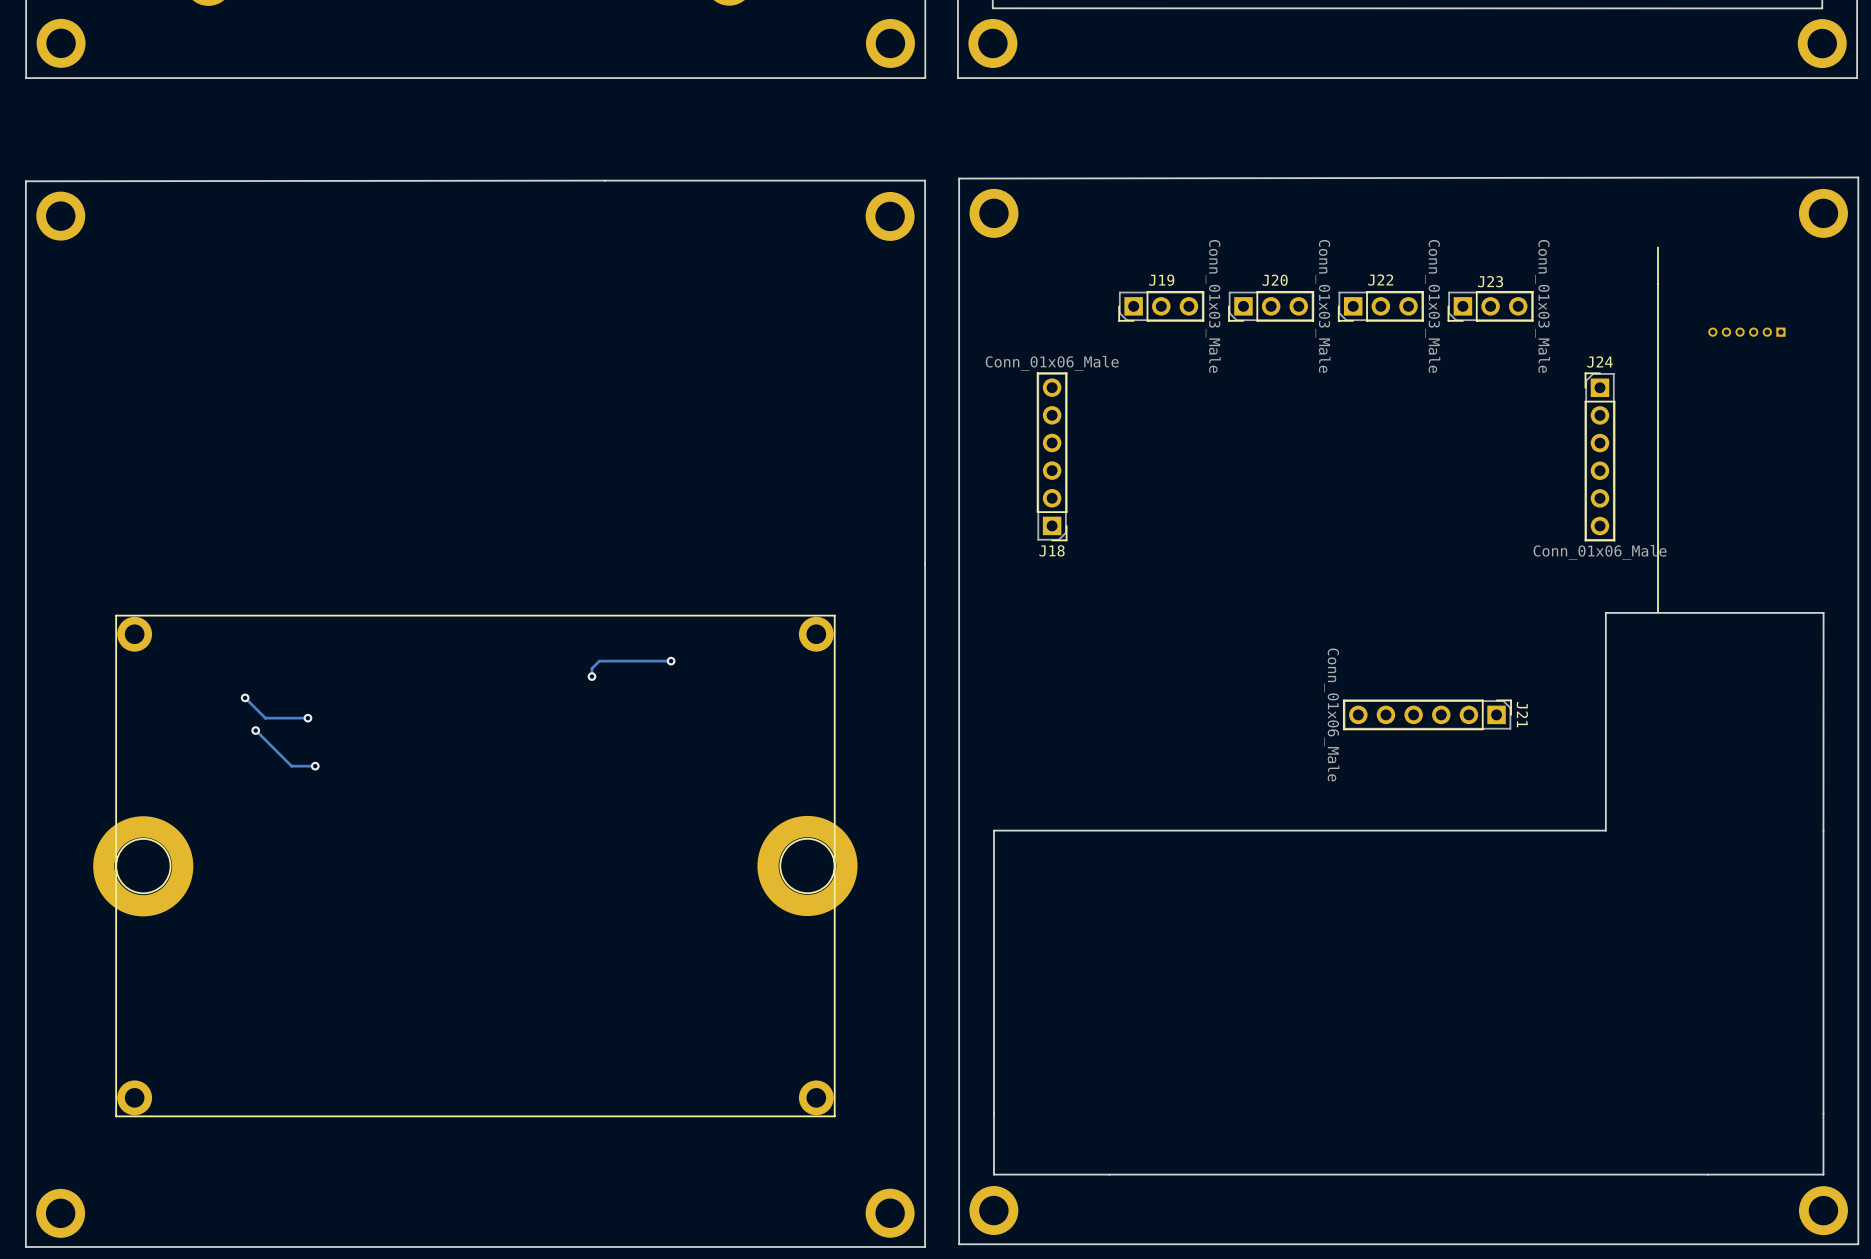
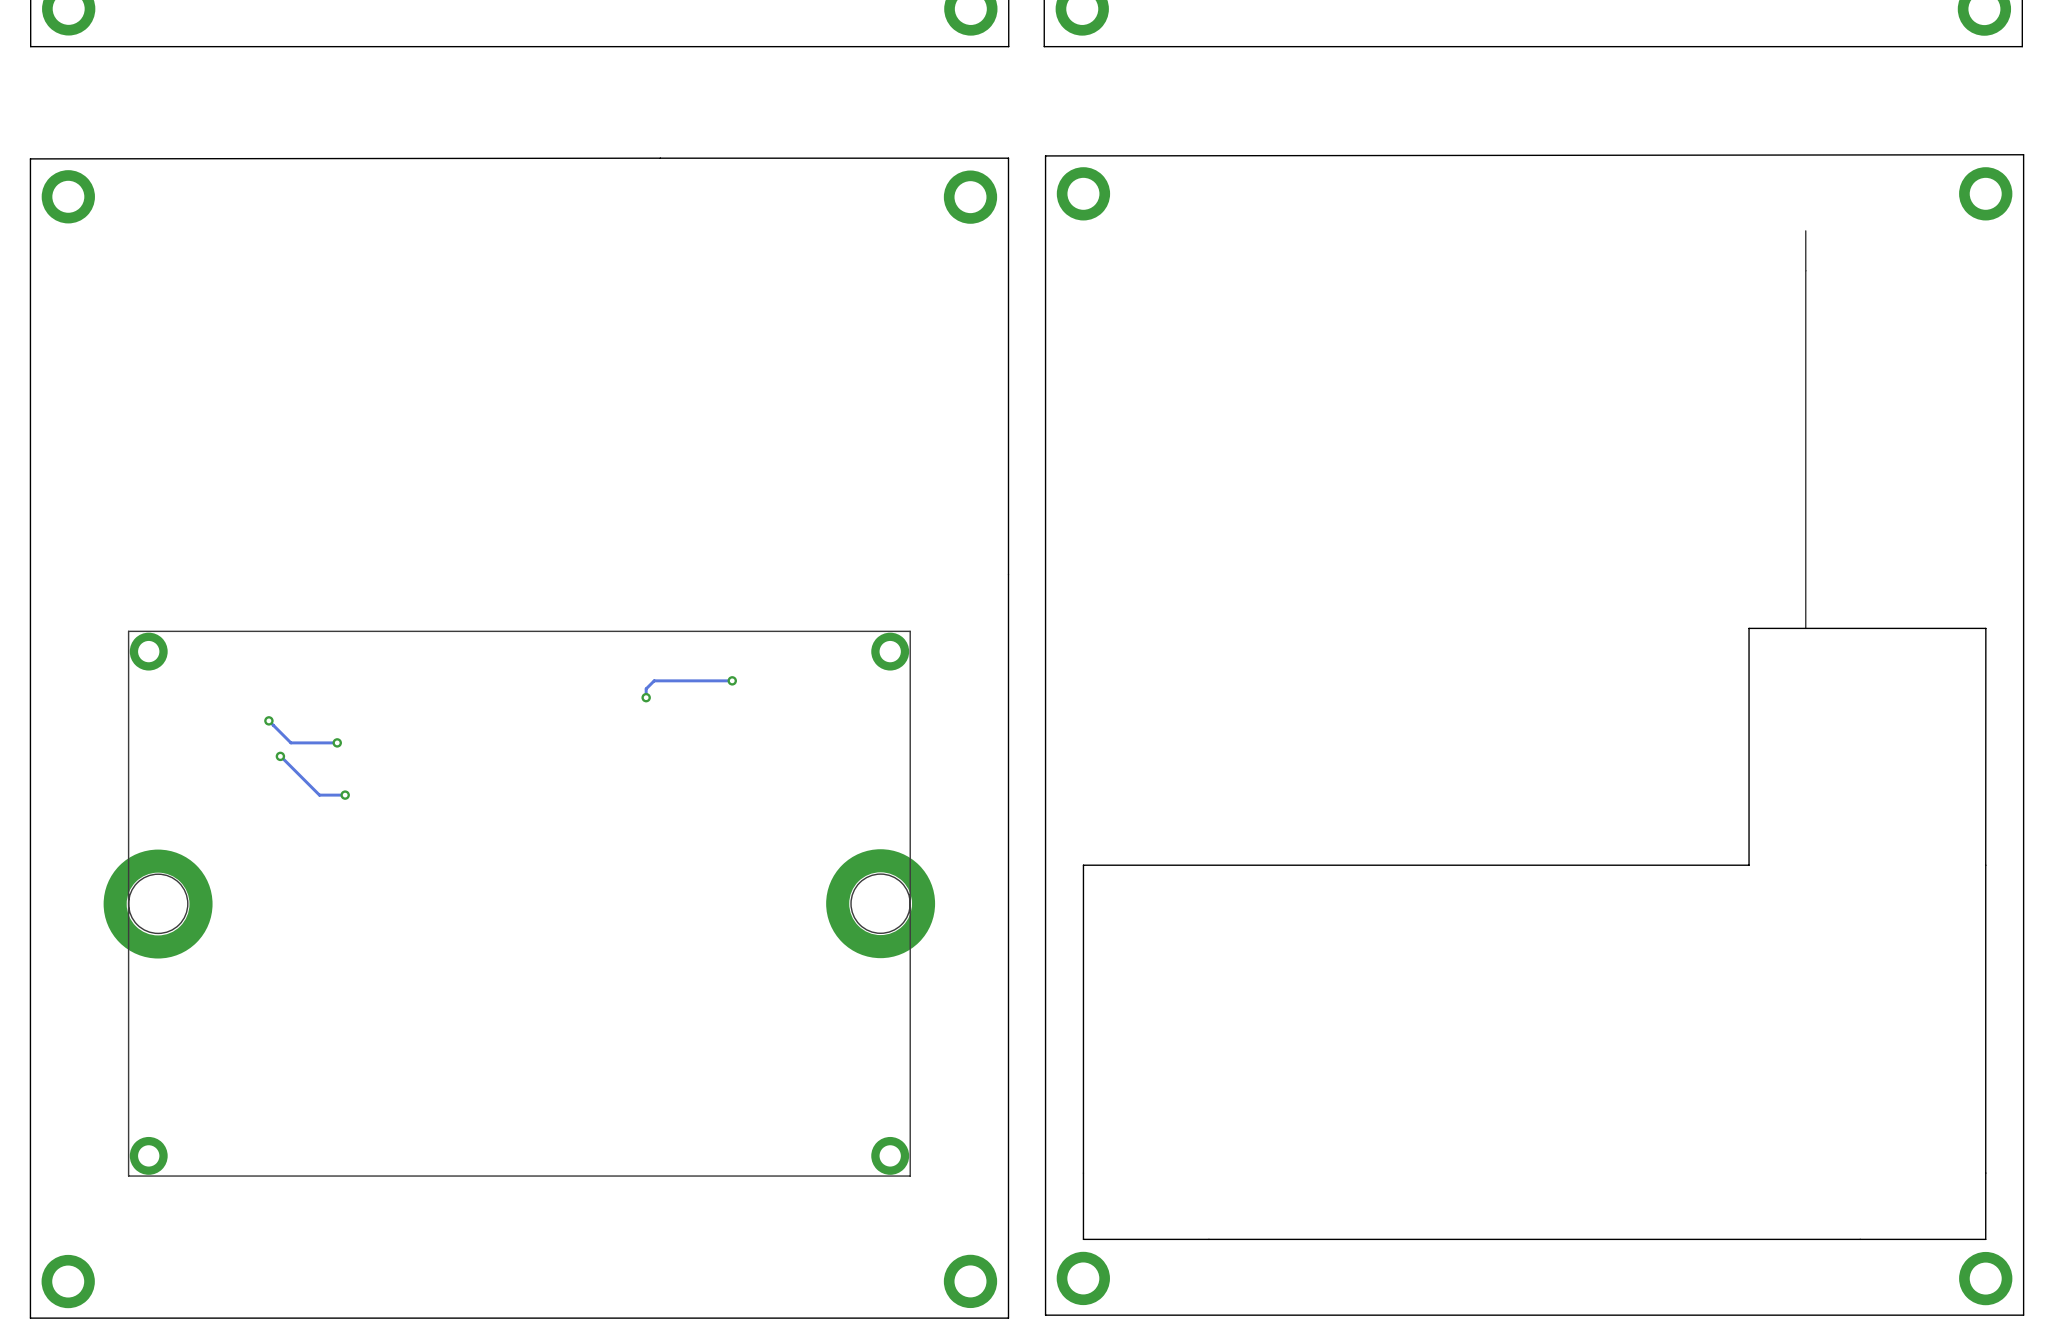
J19: Conn_01x03_Male (1161, 306) -> none
J20: Conn_01x03_Male (1271, 306) -> none
J22: Conn_01x03_Male (1380, 306) -> none
J23: Conn_01x03_Male (1490, 306) -> none
part: (1746, 332) -> none
J18: Conn_01x06_Male (1052, 456) -> none
J24: Conn_01x06_Male (1599, 456) -> none
J21: Conn_01x06_Male (1427, 714) -> none

